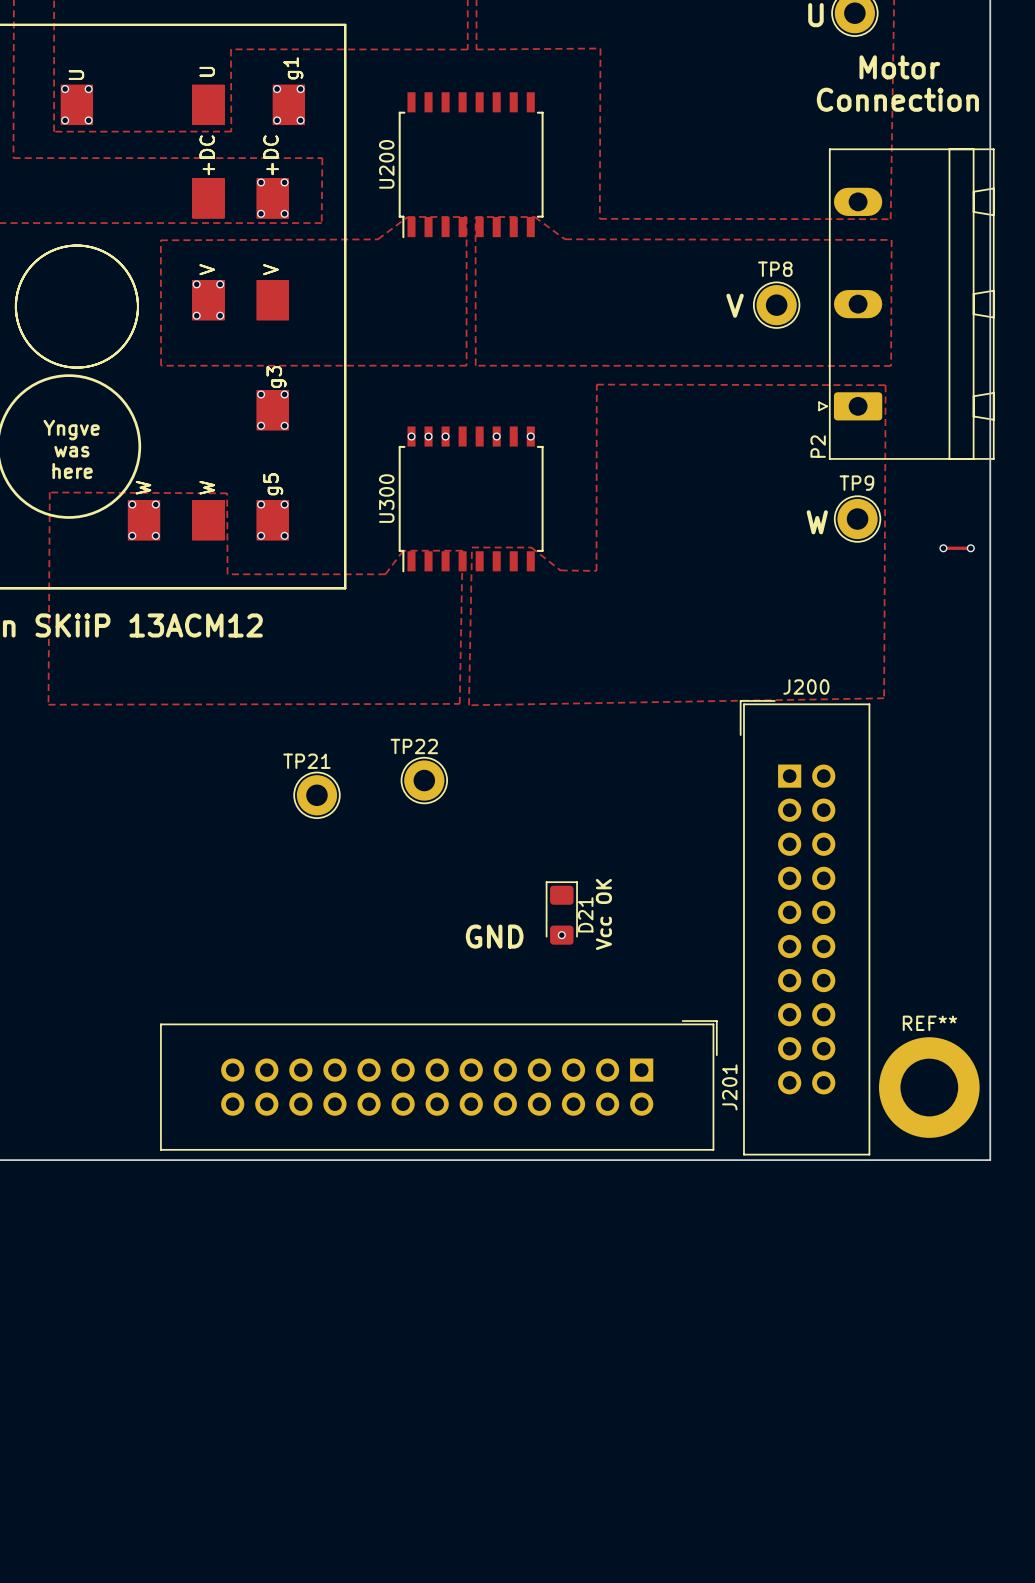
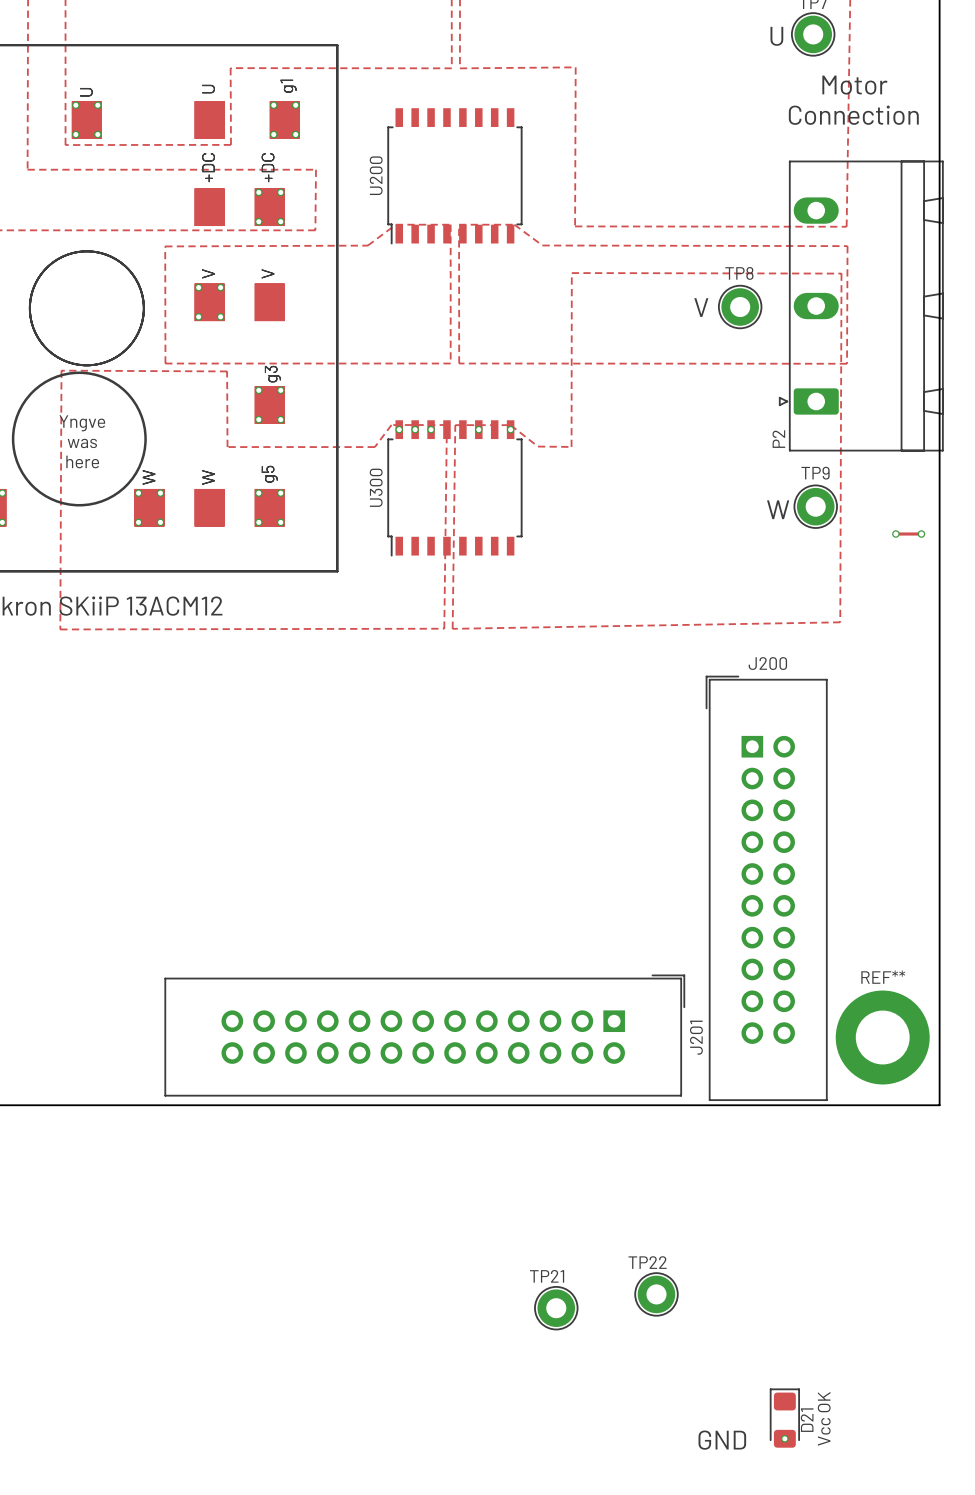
zone outline: none -> (61, 370) (60, 629) (444, 628) (446, 425) (391, 425) (374, 447) (227, 447) (227, 371) (61, 370)
zone outline: (596, 384) (596, 570) (560, 570) (531, 547) (472, 547) (468, 705) (884, 698) (885, 385) (596, 384) -> (571, 273) (571, 446) (537, 446) (510, 425) (455, 425) (452, 628) (840, 622) (841, 273) (571, 273)
zone outline: (49, 492) (48, 704) (459, 703) (462, 550) (403, 550) (385, 574) (227, 574) (227, 493) (49, 492) -> none
TP22 position: (424, 780) -> (656, 1294)
TP21 position: (316, 795) -> (556, 1308)
D21 position: (561, 913) -> (784, 1418)
text: Vcc OK (603, 914) -> none
via: (561, 935) -> none
text: GND (494, 936) -> none
text: none -> Vcc OK (824, 1418)
via: none -> (784, 1438)
text: none -> GND (722, 1440)

